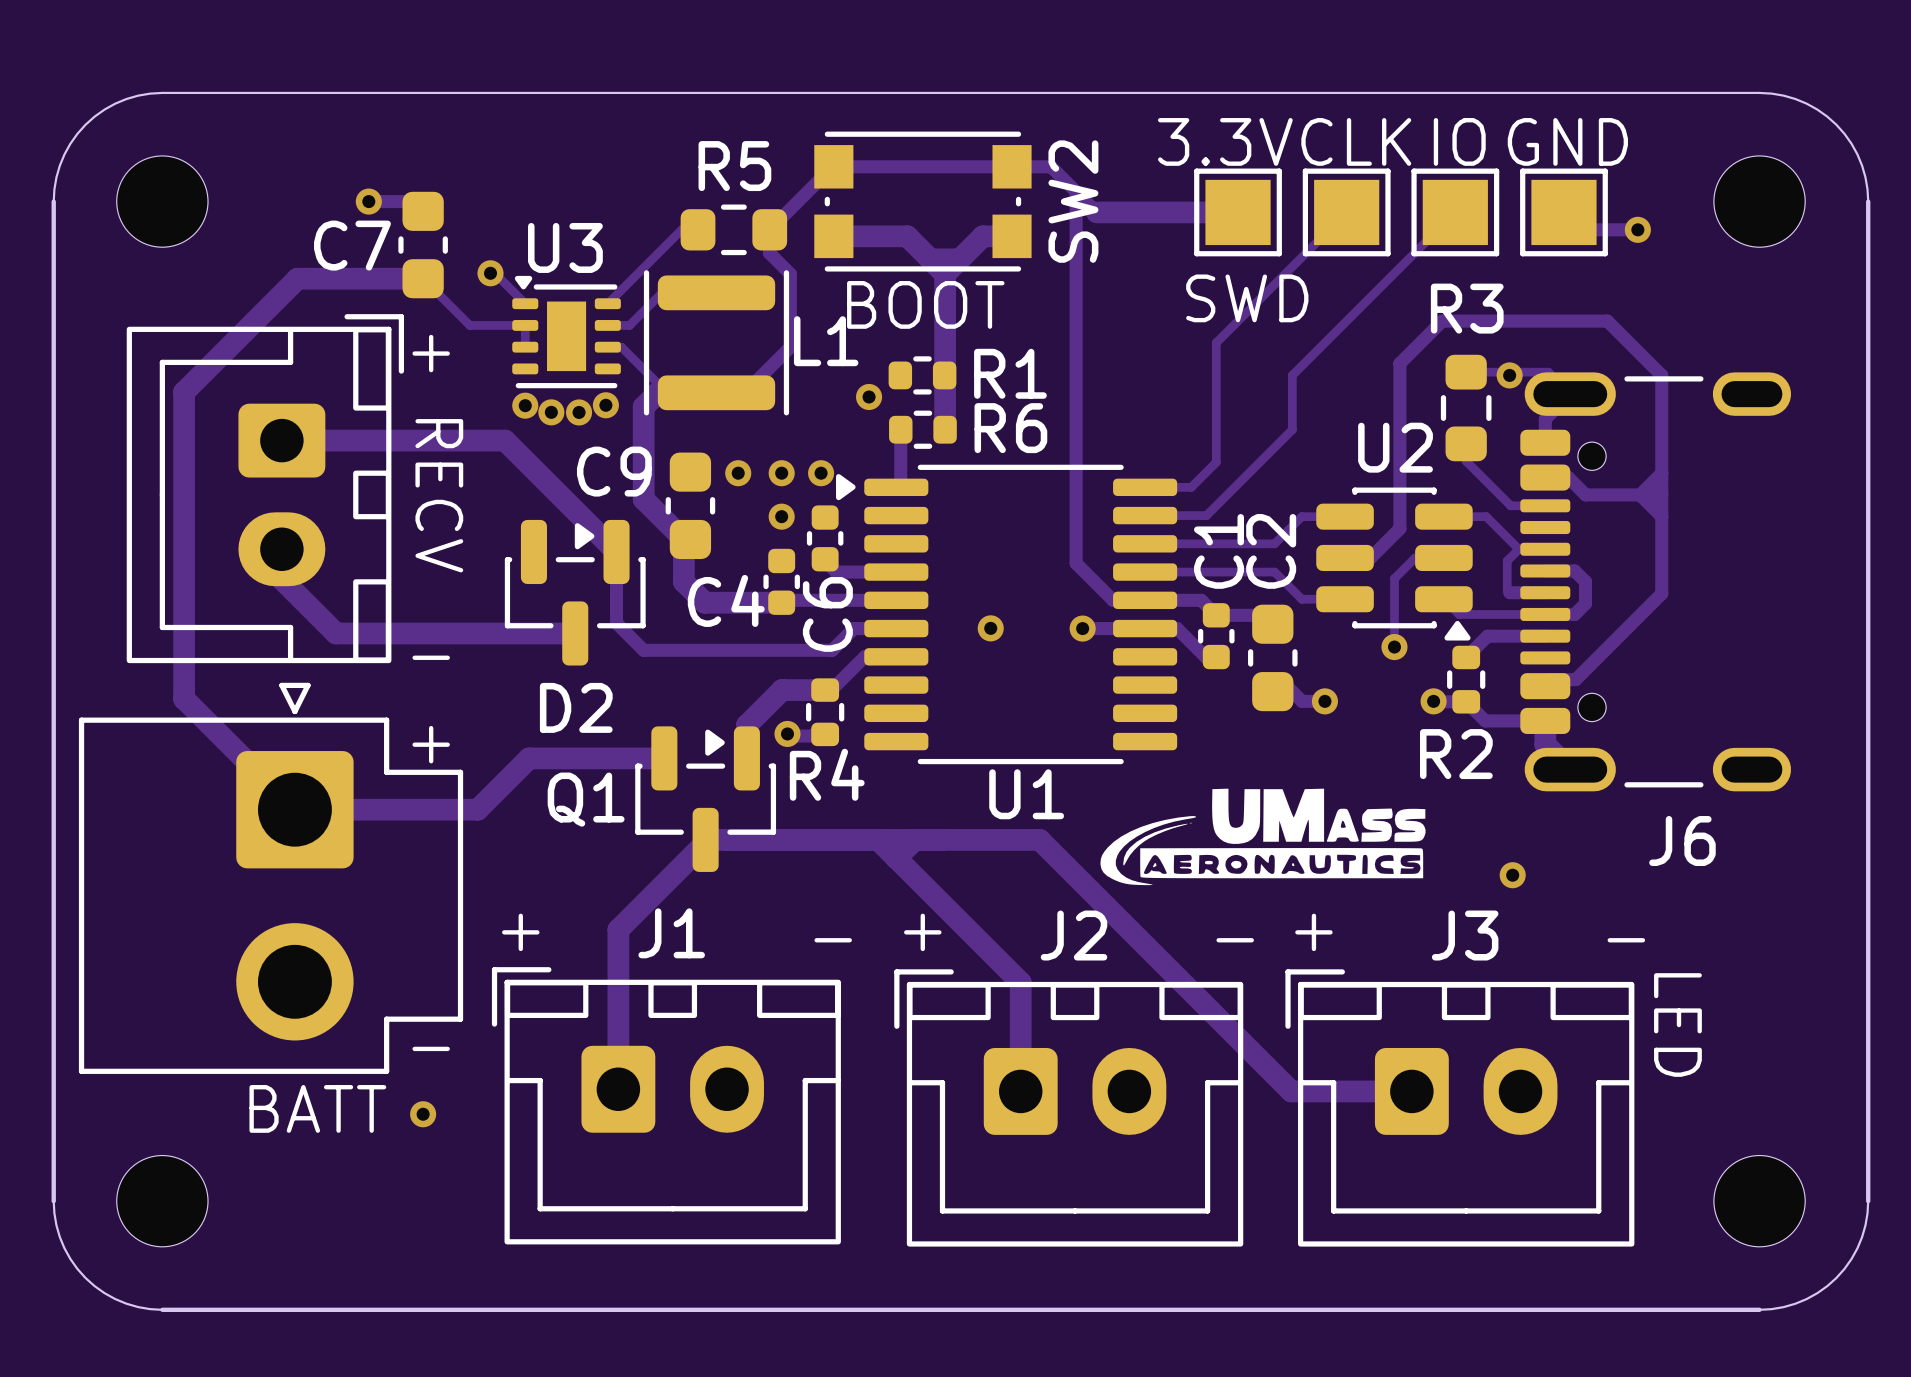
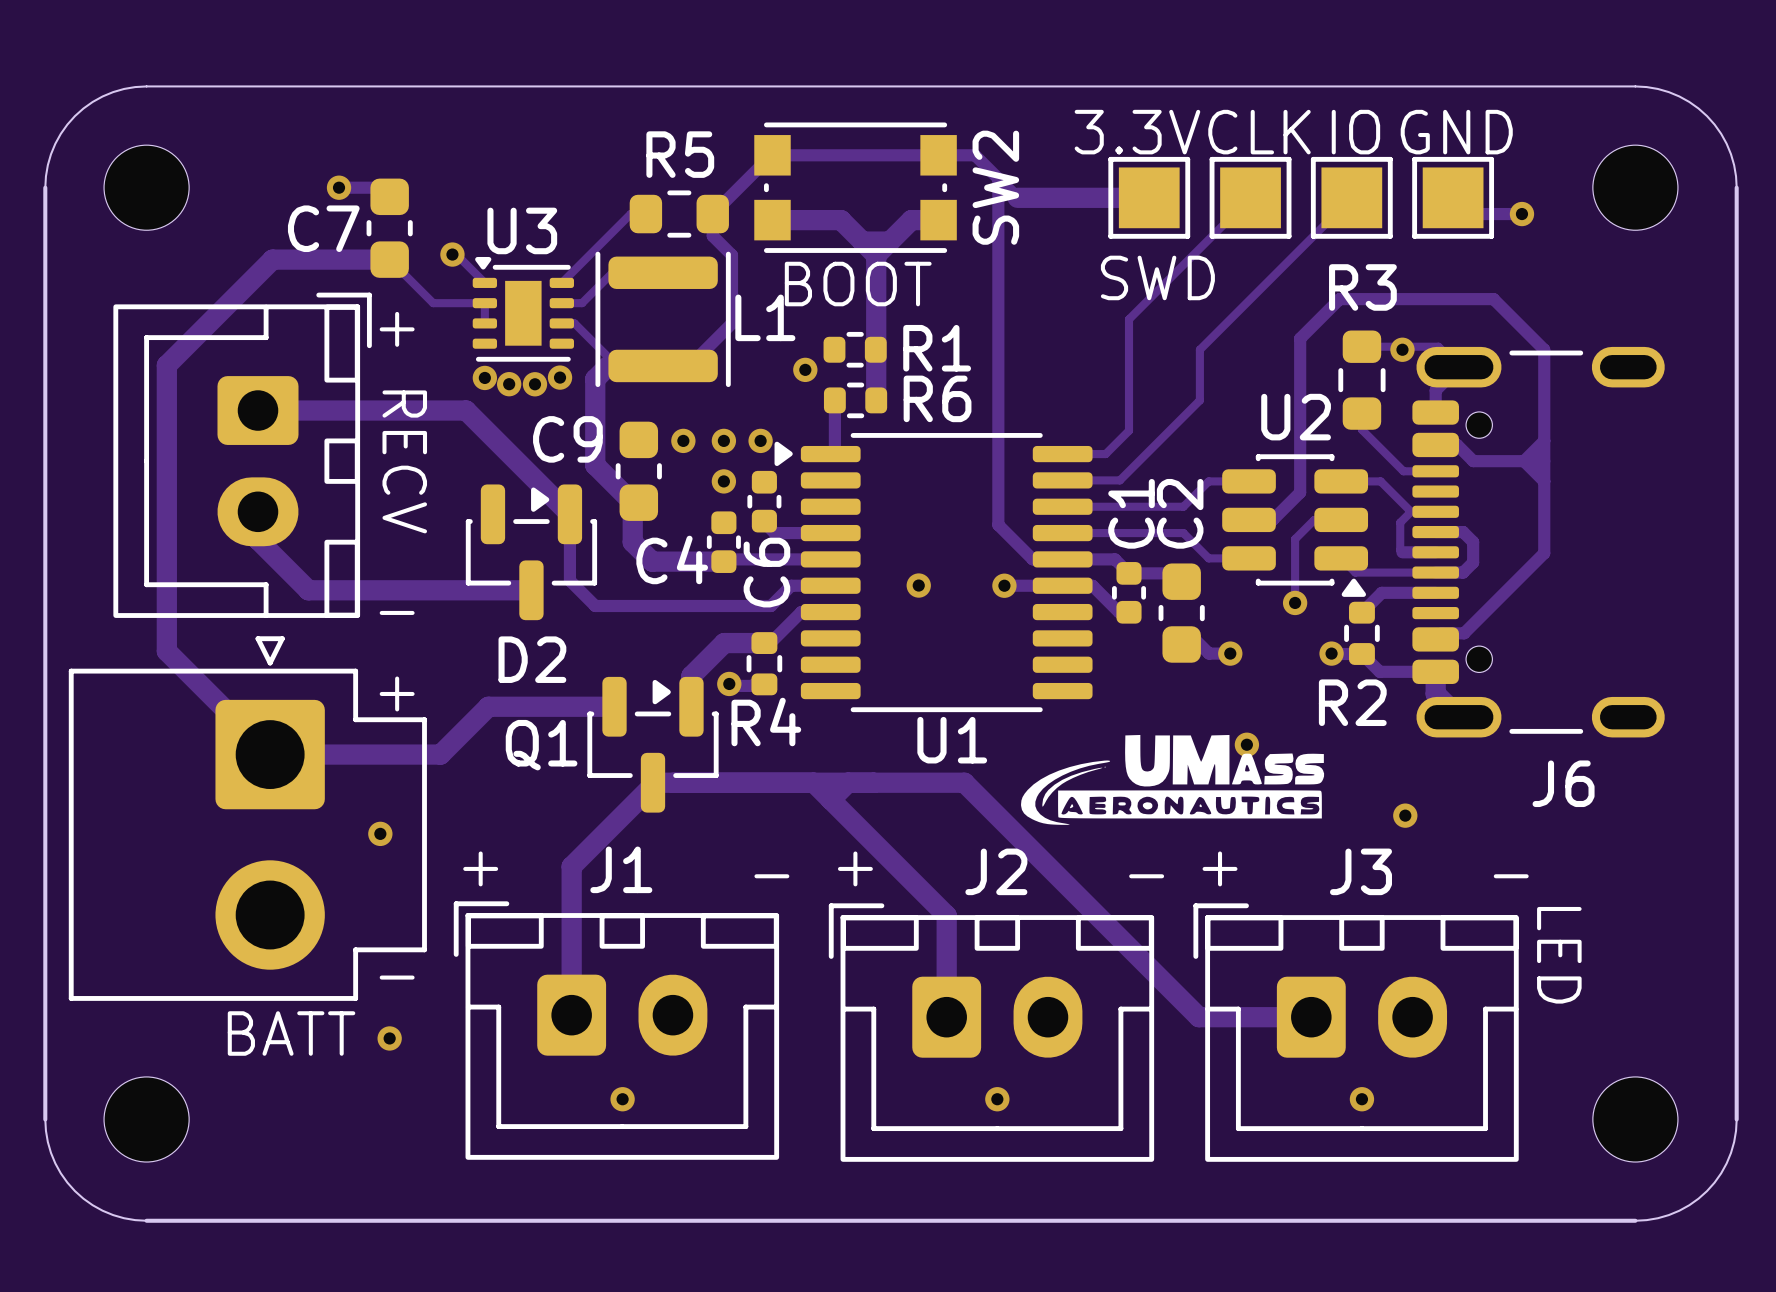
via: none -> (1246, 744)
via: none -> (380, 833)
via: none -> (622, 1099)
via: none -> (997, 1099)
via: none -> (1361, 1099)

